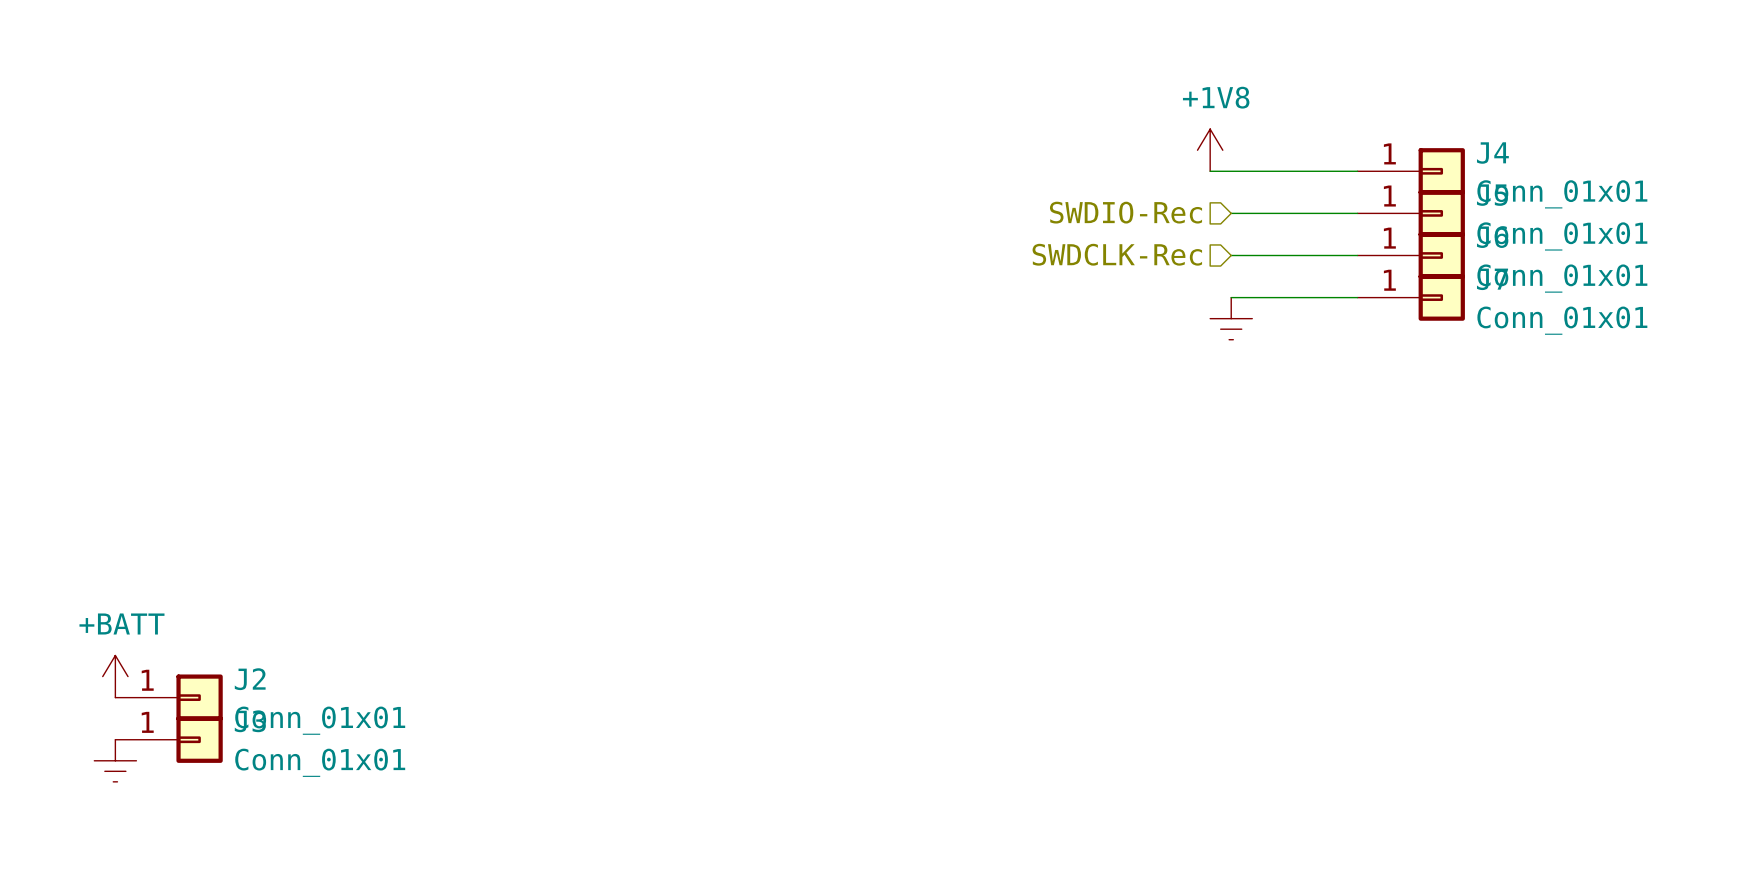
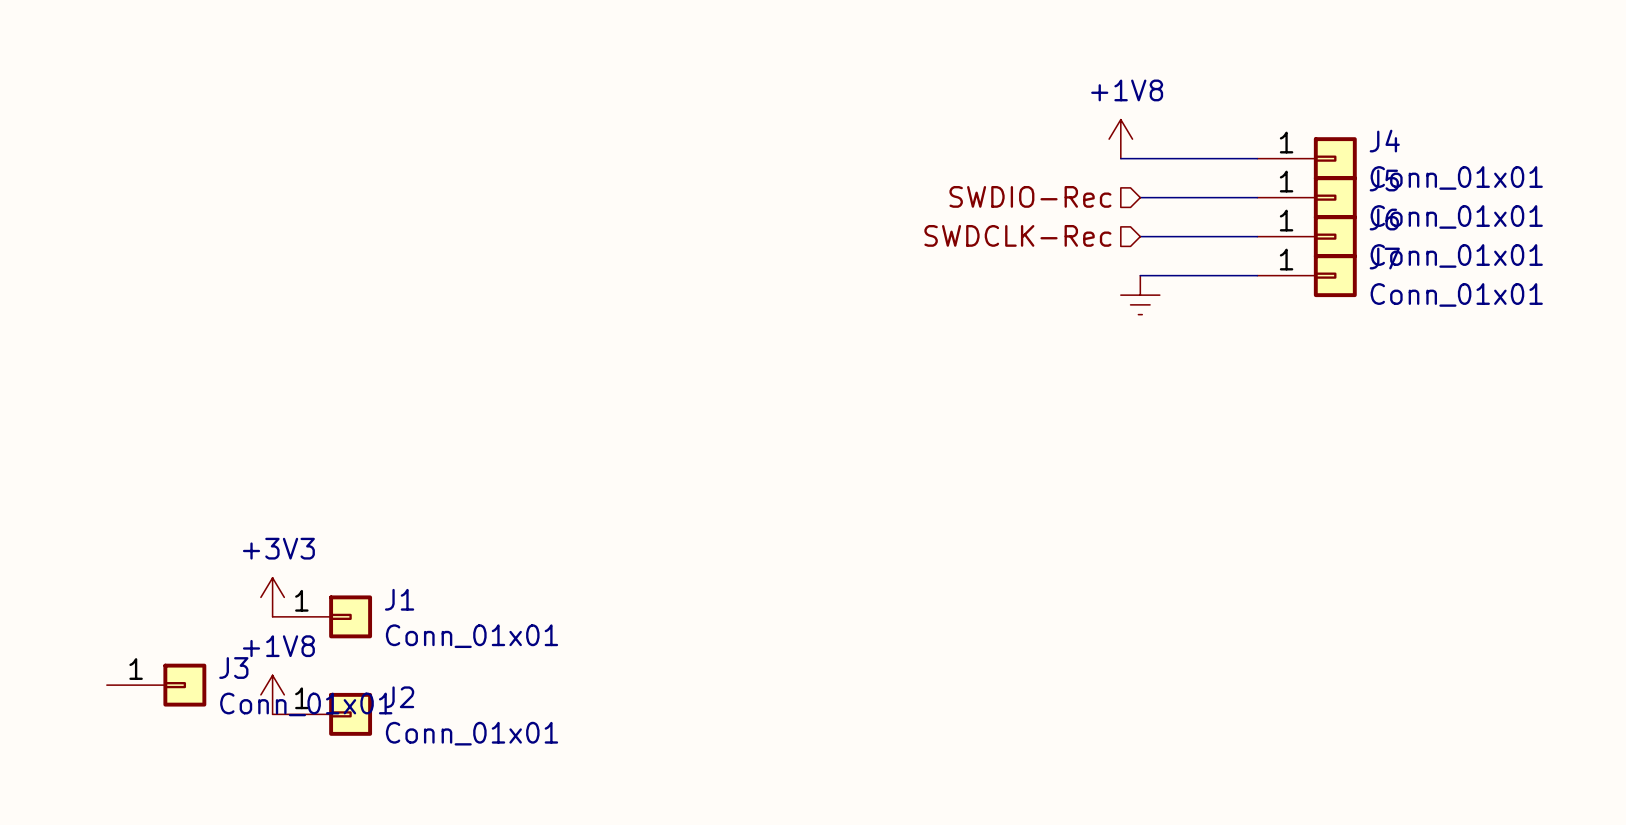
power symbol: none -> +3V3 (272, 597)
J1: none -> Conn_01x01 (322, 616)
power symbol: +BATT (115, 676) -> none
J2 position: (169, 697) -> (322, 714)
power symbol: none -> +1V8 (272, 694)
power symbol: (115, 760) -> none

